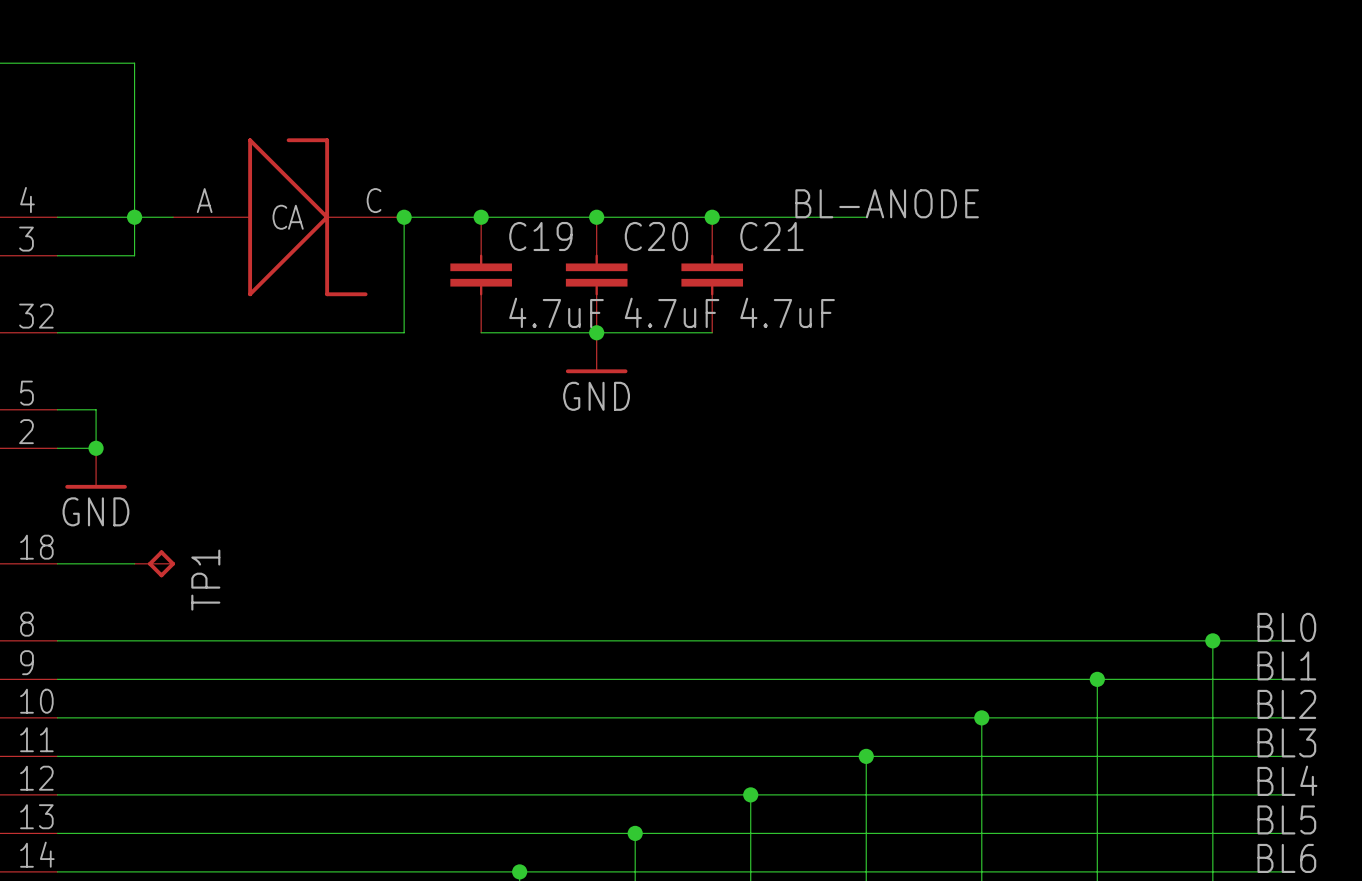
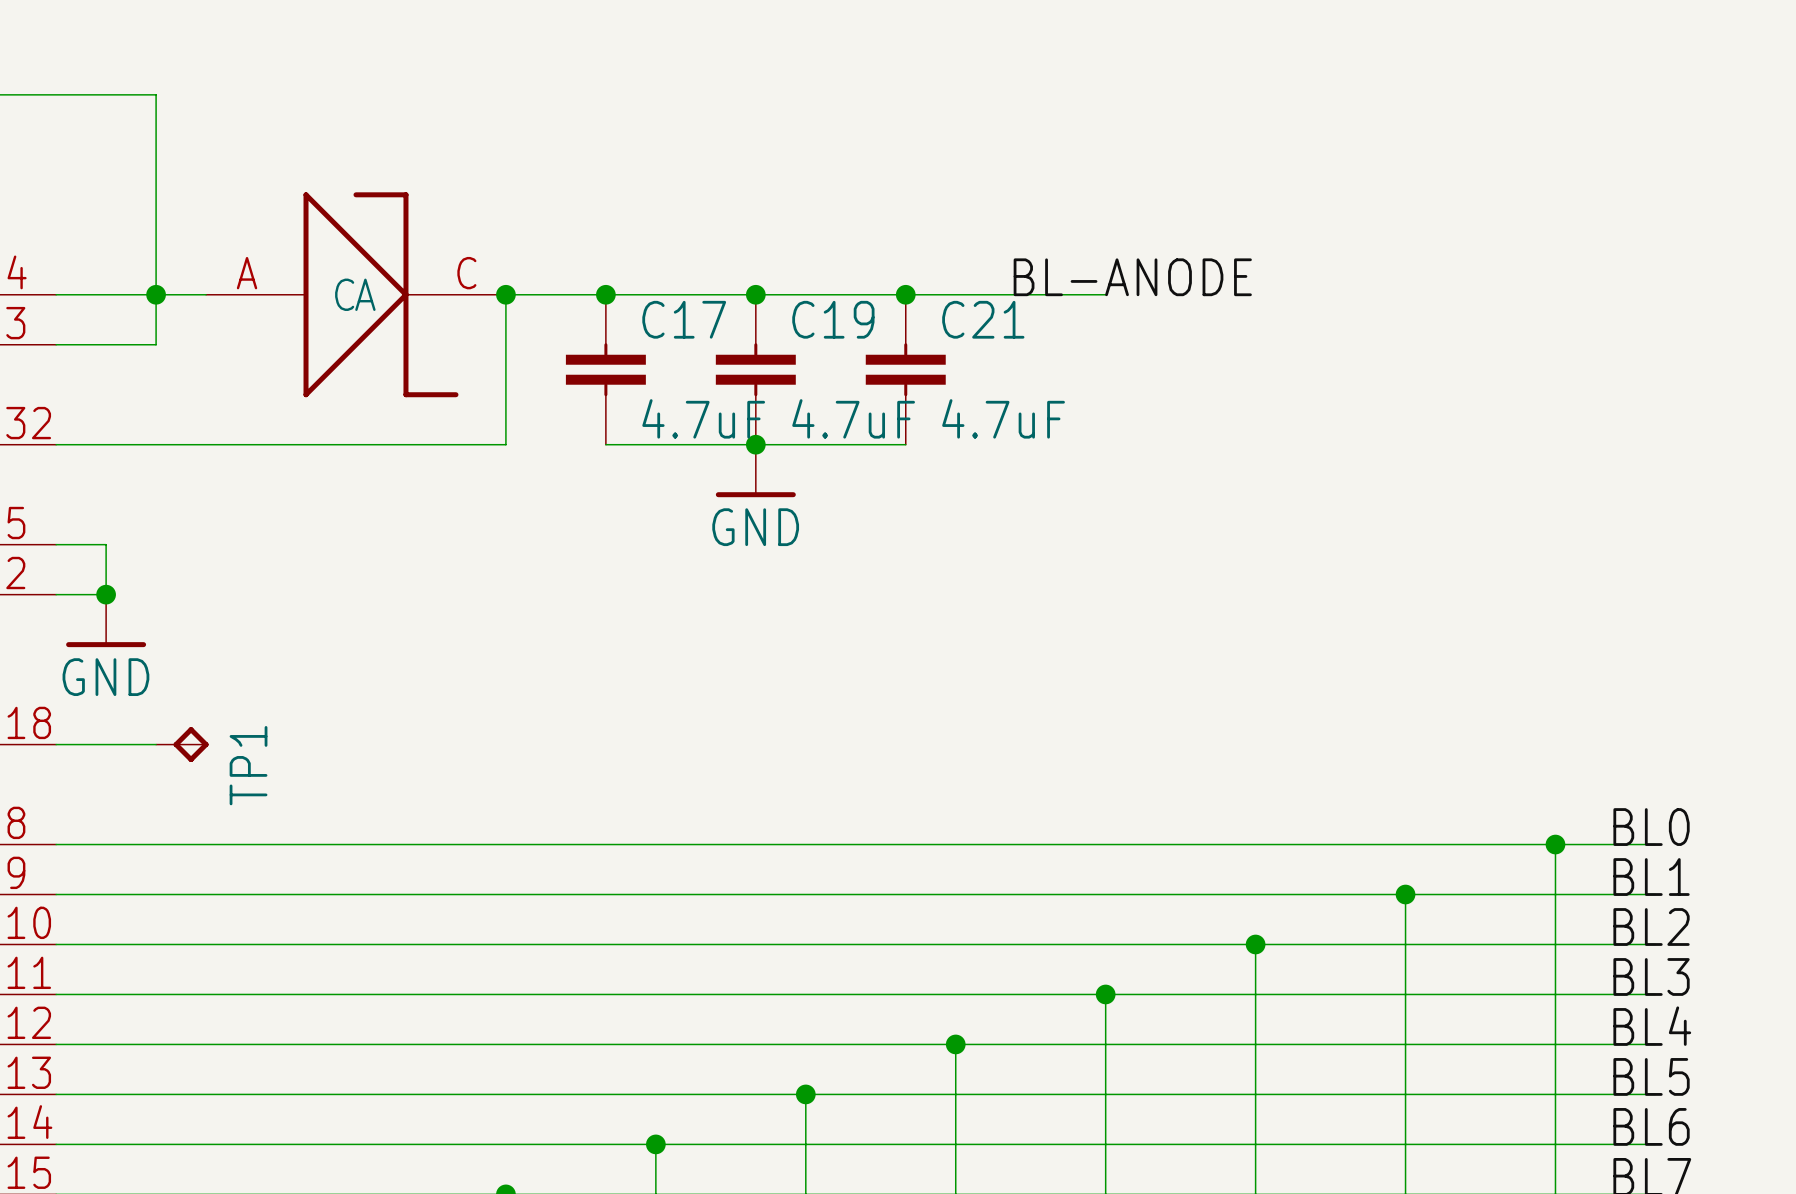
C19 name: C19 (540, 236) -> C17 (684, 319)
C20 name: C20 (656, 236) -> C19 (833, 319)

